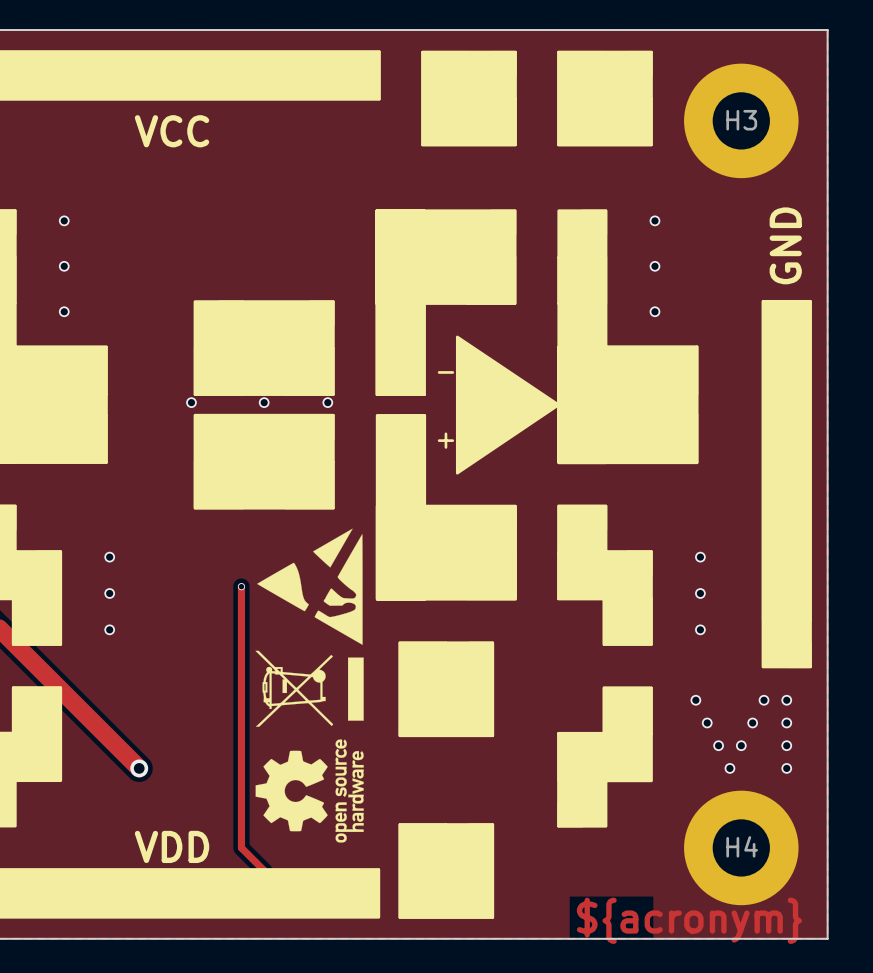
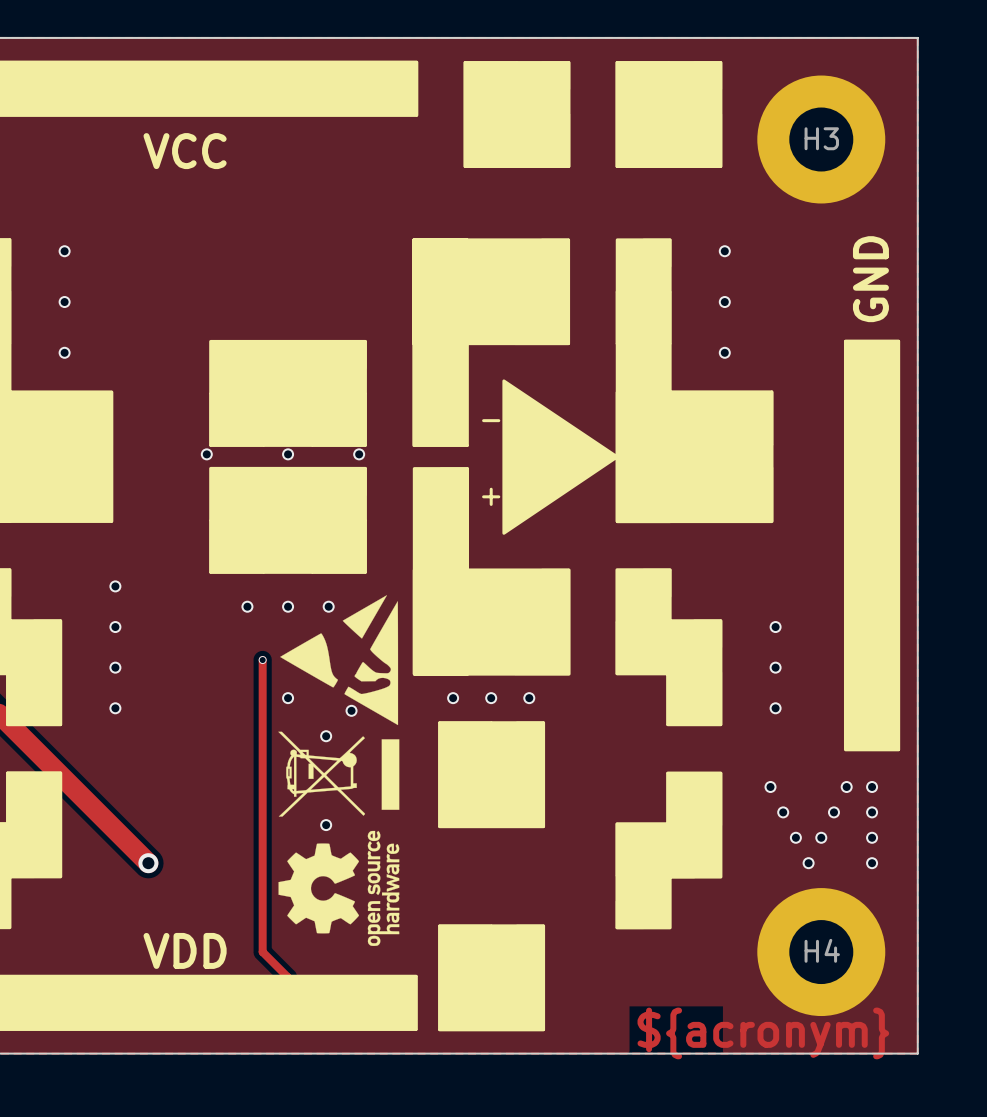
via: none -> (115, 586)
via: none -> (247, 606)
via: none -> (288, 606)
via: none -> (328, 606)
via: none -> (288, 698)
via: none -> (453, 698)
via: none -> (491, 698)
via: none -> (529, 698)
via: none -> (351, 710)
via: none -> (326, 736)
via: none -> (326, 825)

